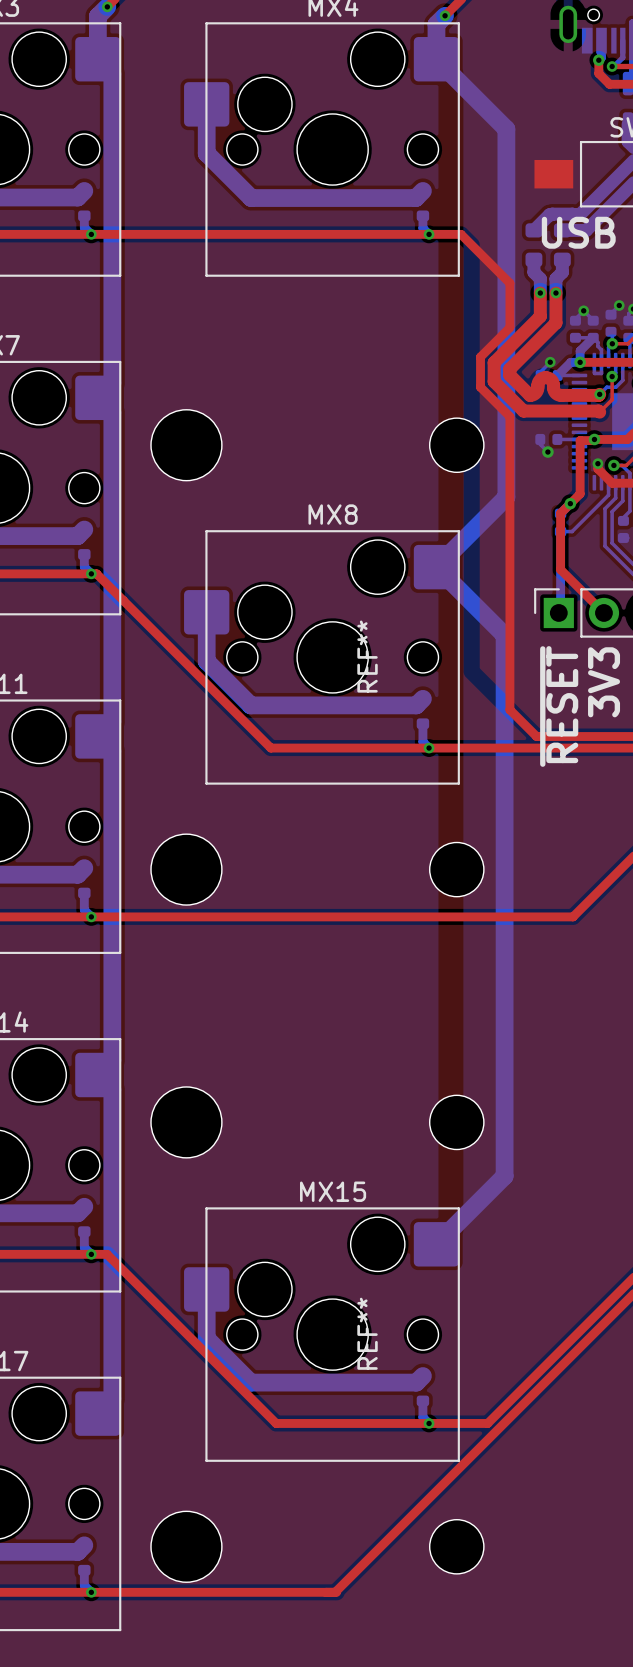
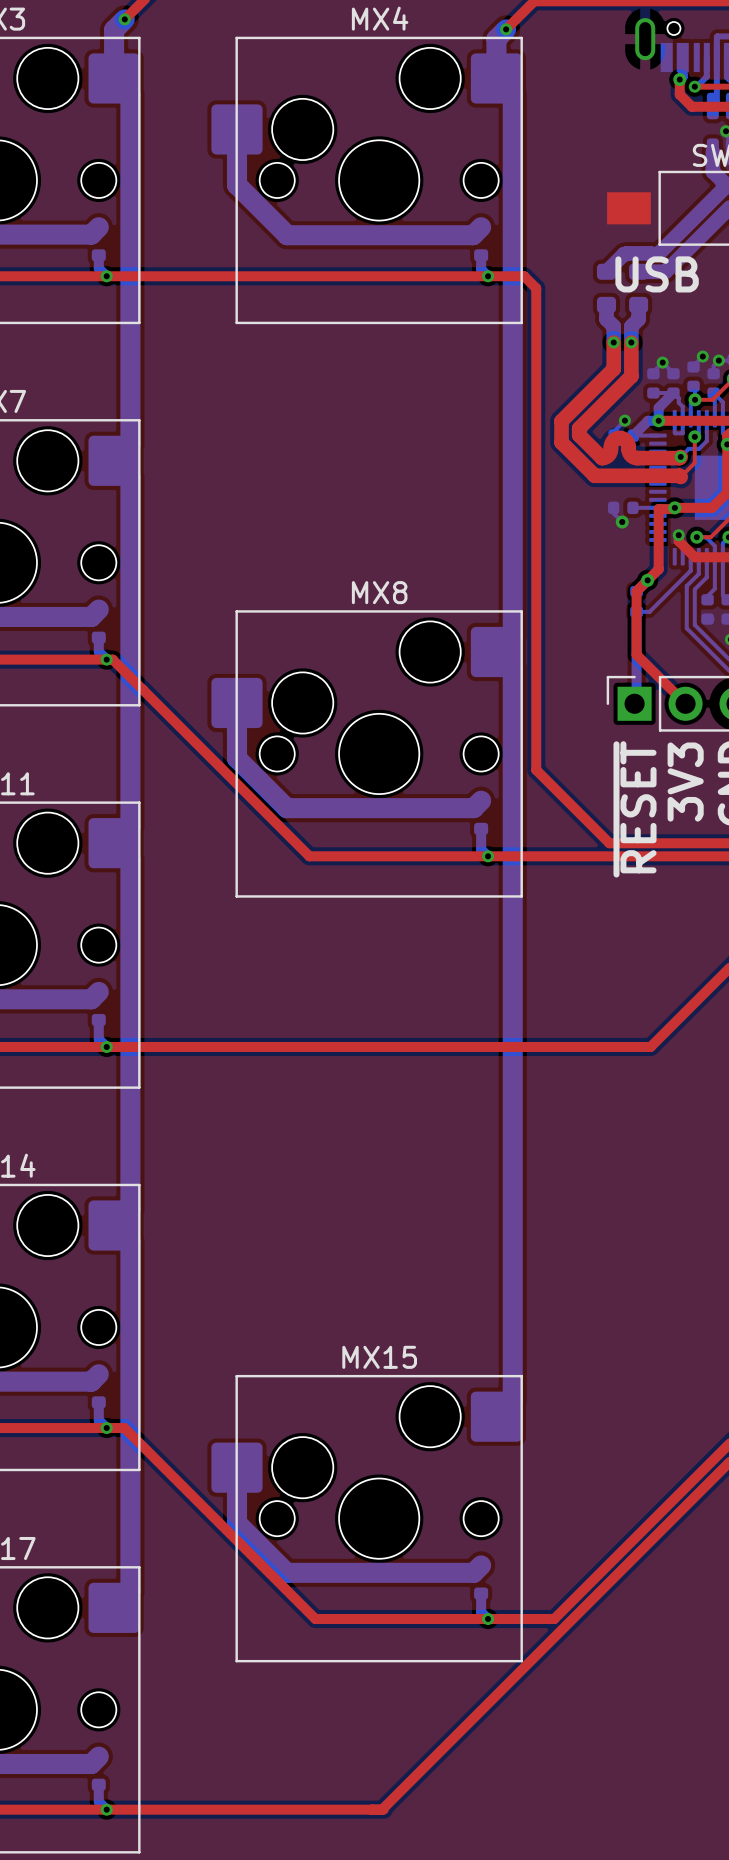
bottom track: (450, 73) (506, 129) (506, 497) (450, 552) -> (512, 94) (512, 635)
top track: (471, 245) (509, 283) (509, 327) (480, 357) (480, 387) (509, 416) (509, 709) -> (536, 288) (536, 770) (579, 813)
bottom track: (450, 581) (504, 635) (504, 1176) (450, 1229) -> (512, 668) (512, 1400)
REF**: (317, 657) -> none
REF**: (317, 1334) -> none

